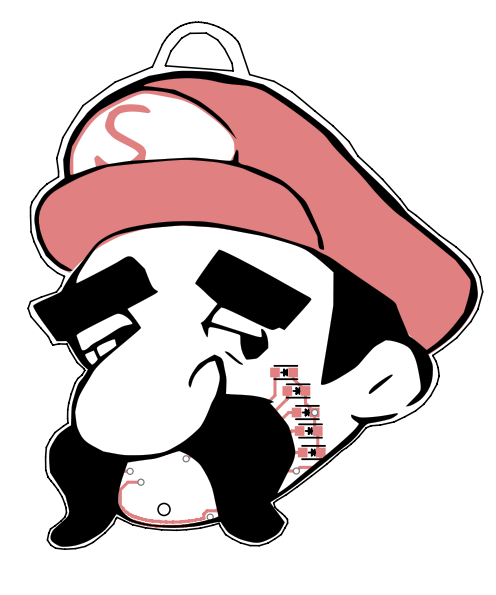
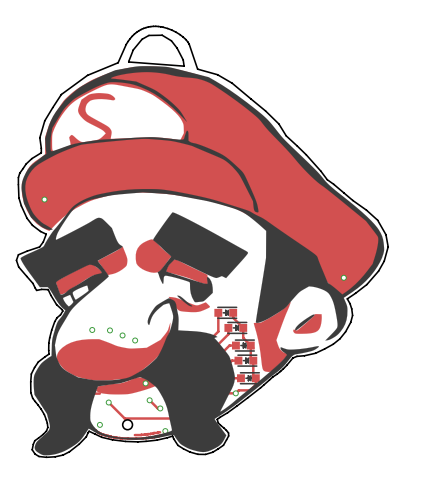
drawing: none -> [21, 66, 384, 395]
drawing: [36, 71, 479, 355] -> none
via: none -> (44, 199)
via: none -> (343, 277)
via: none -> (92, 329)
via: none -> (109, 330)
via: none -> (122, 335)
via: none -> (135, 340)
via: (314, 412) -> none
via: (130, 471) -> none
track: none -> (149, 400) (157, 408) (160, 408)
via: none -> (149, 400)
track: (140, 482) (127, 482) (120, 489) (120, 505) (133, 516) (152, 521) (172, 522) -> (108, 402) (124, 418) (177, 418)
via: none -> (160, 408)
track: (225, 501) (216, 510) (207, 510) (203, 514) (203, 518) -> none
via: none -> (99, 424)

